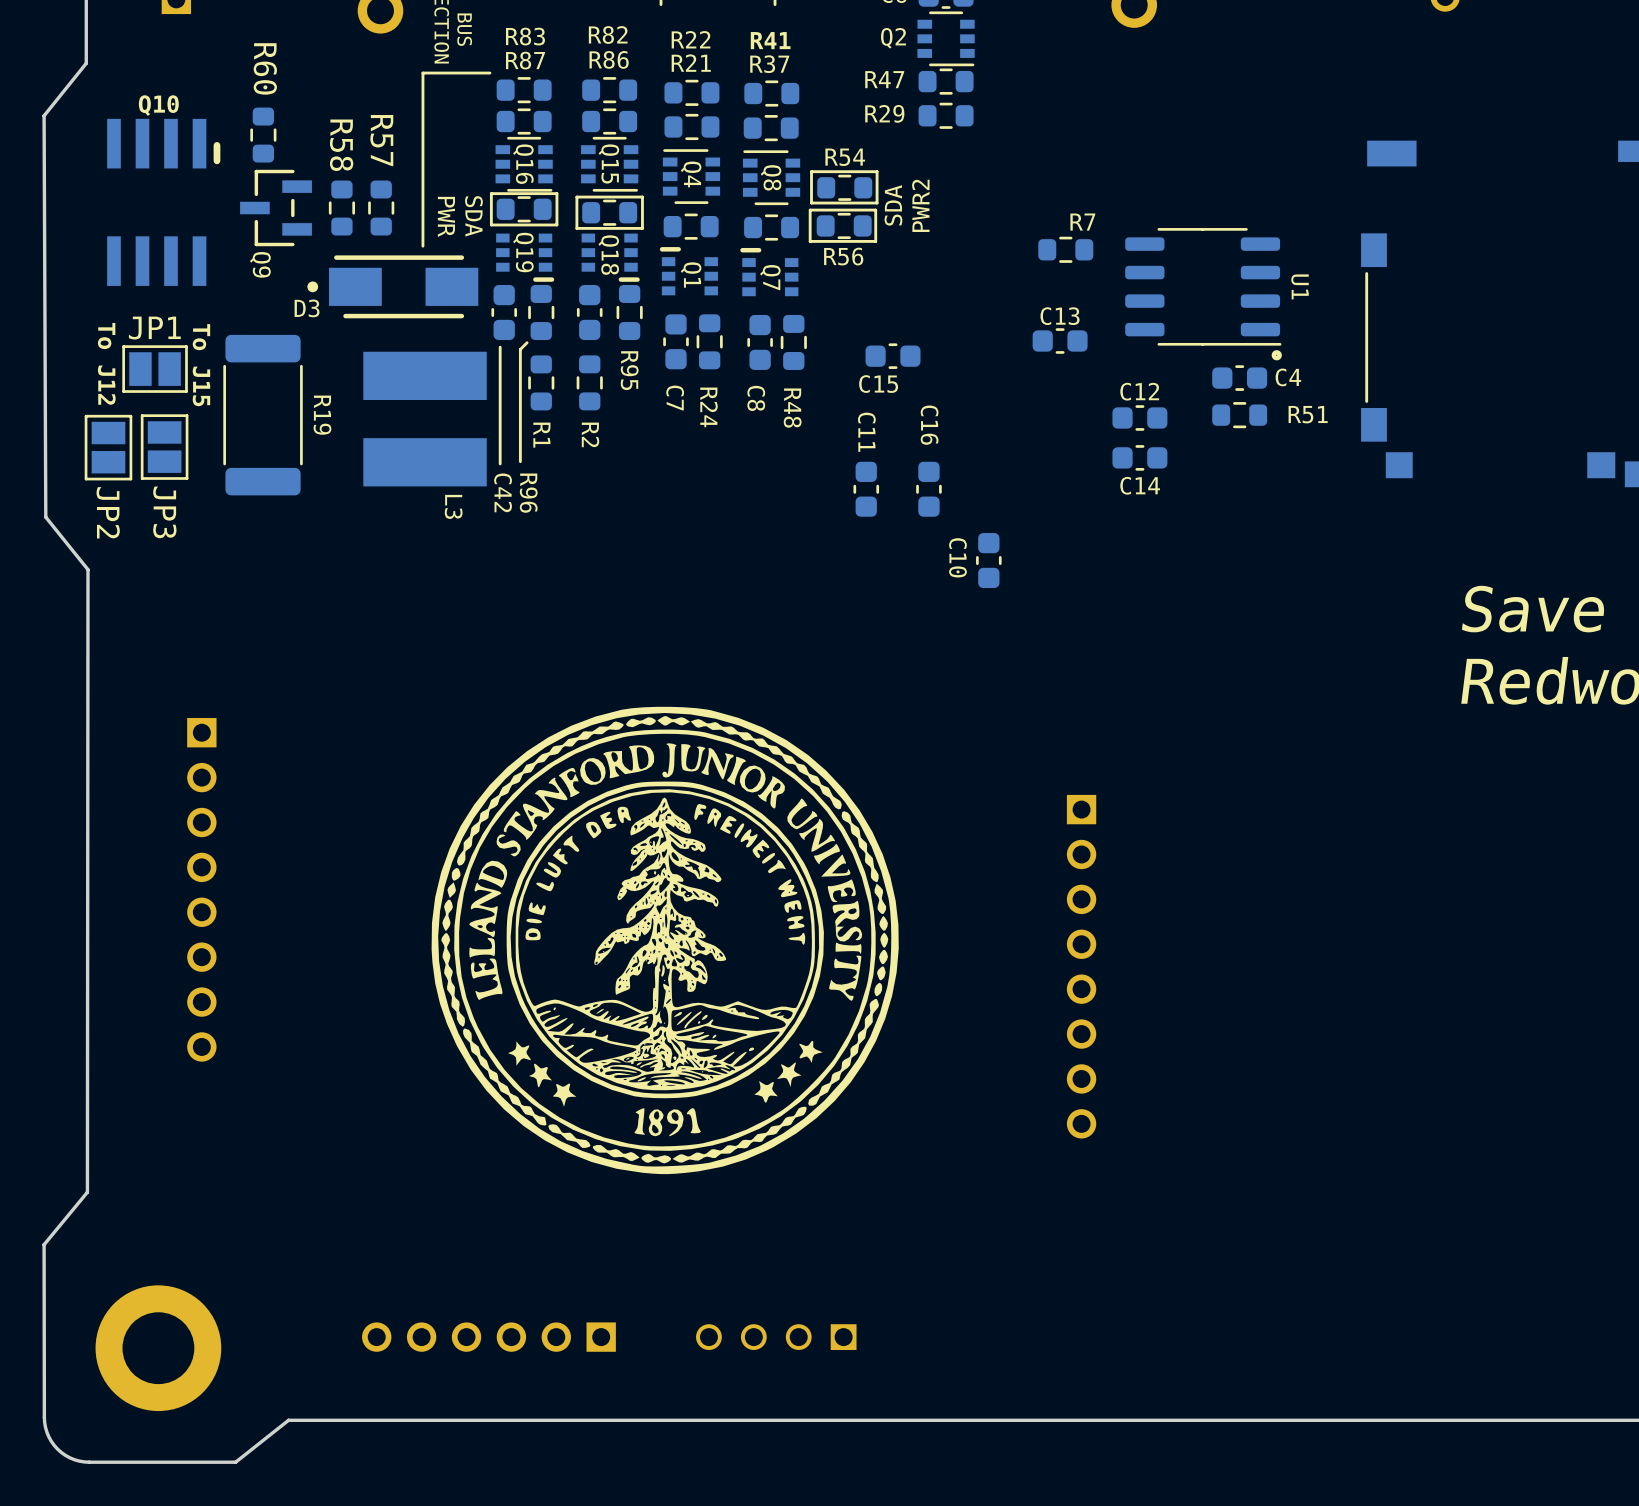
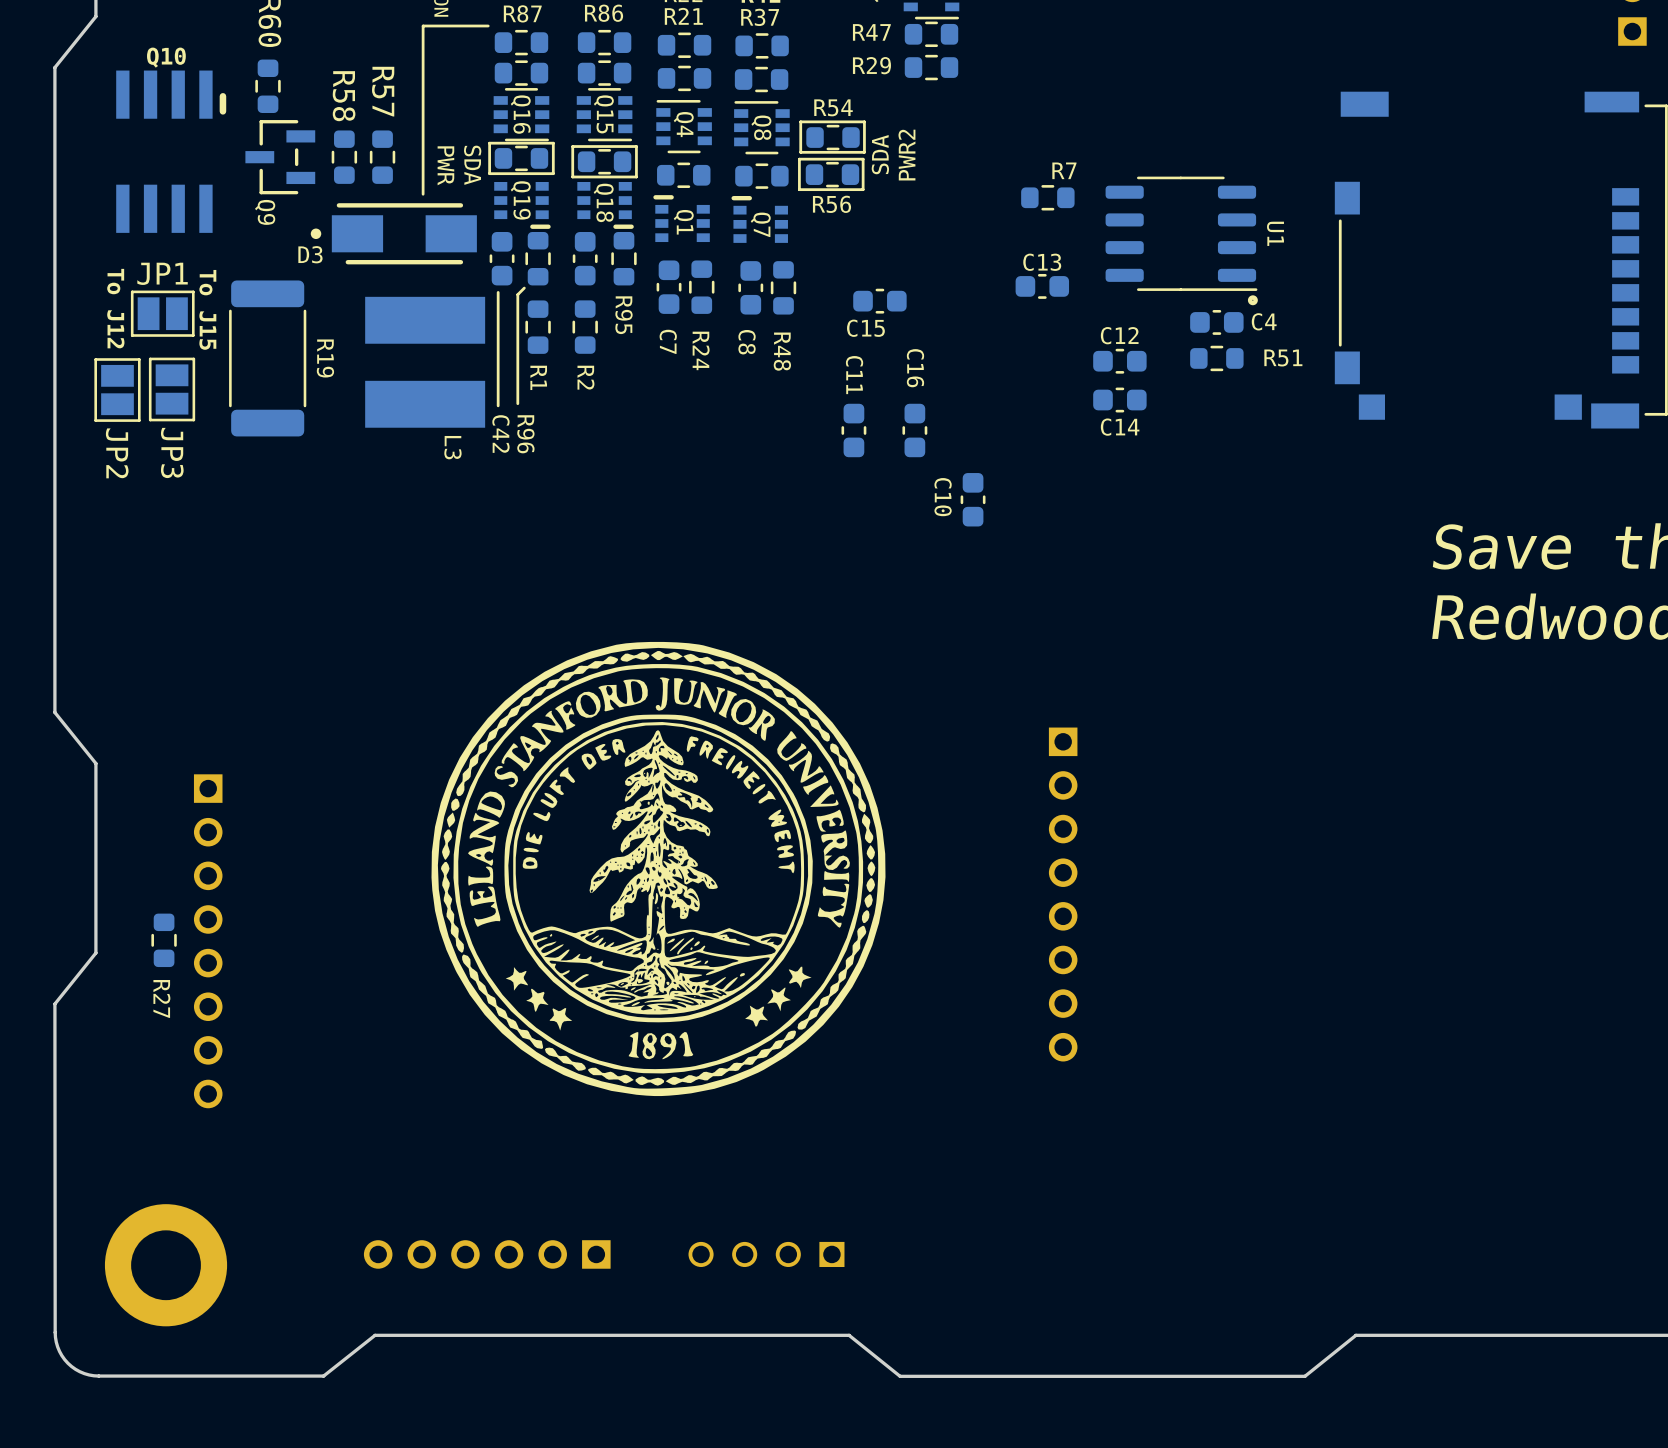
board edge: (44, 115) (45, 517) (87, 569) (87, 1192) (44, 1244) (44, 1417) -> (54, 67) (54, 712) (95, 763) (95, 953) (54, 1003) (55, 1332)
part position: (201, 889) -> (208, 941)
R27: none -> (164, 940)
board edge: (373, 1420) (288, 1420) (235, 1462) -> (375, 1335) (323, 1376) (241, 1376)
board edge: (1382, 1420) (861, 1420) -> (1355, 1335) (1304, 1376) (900, 1376) (849, 1335)

